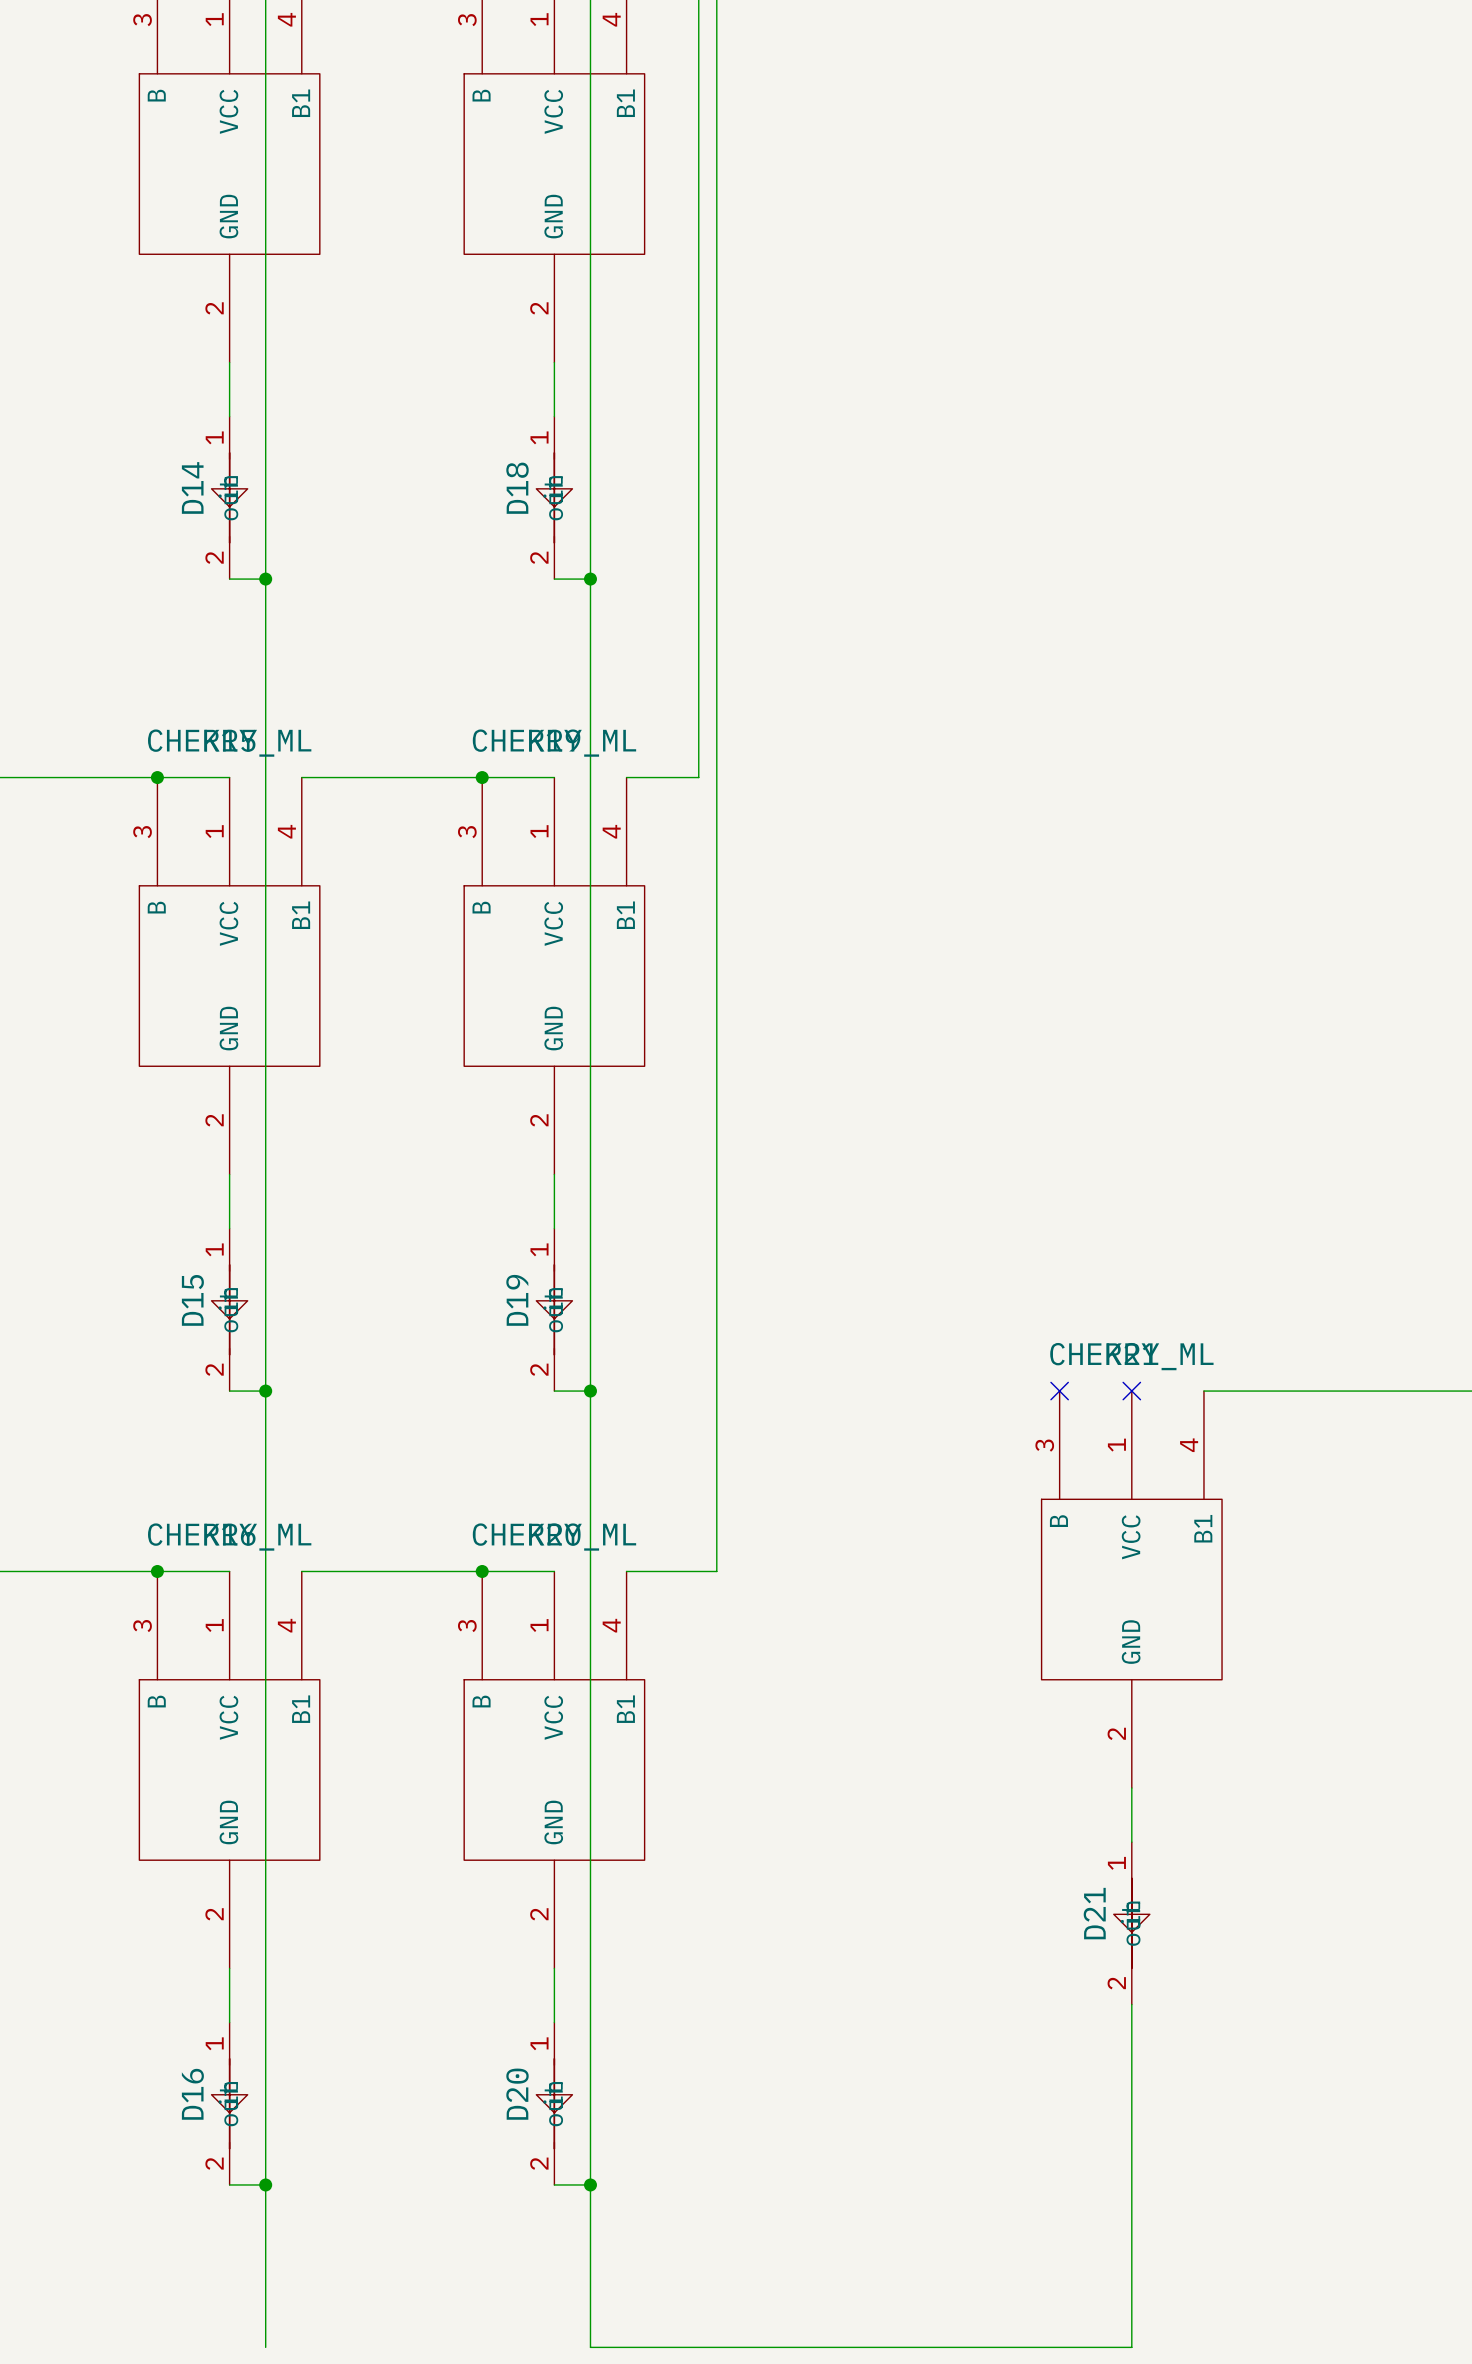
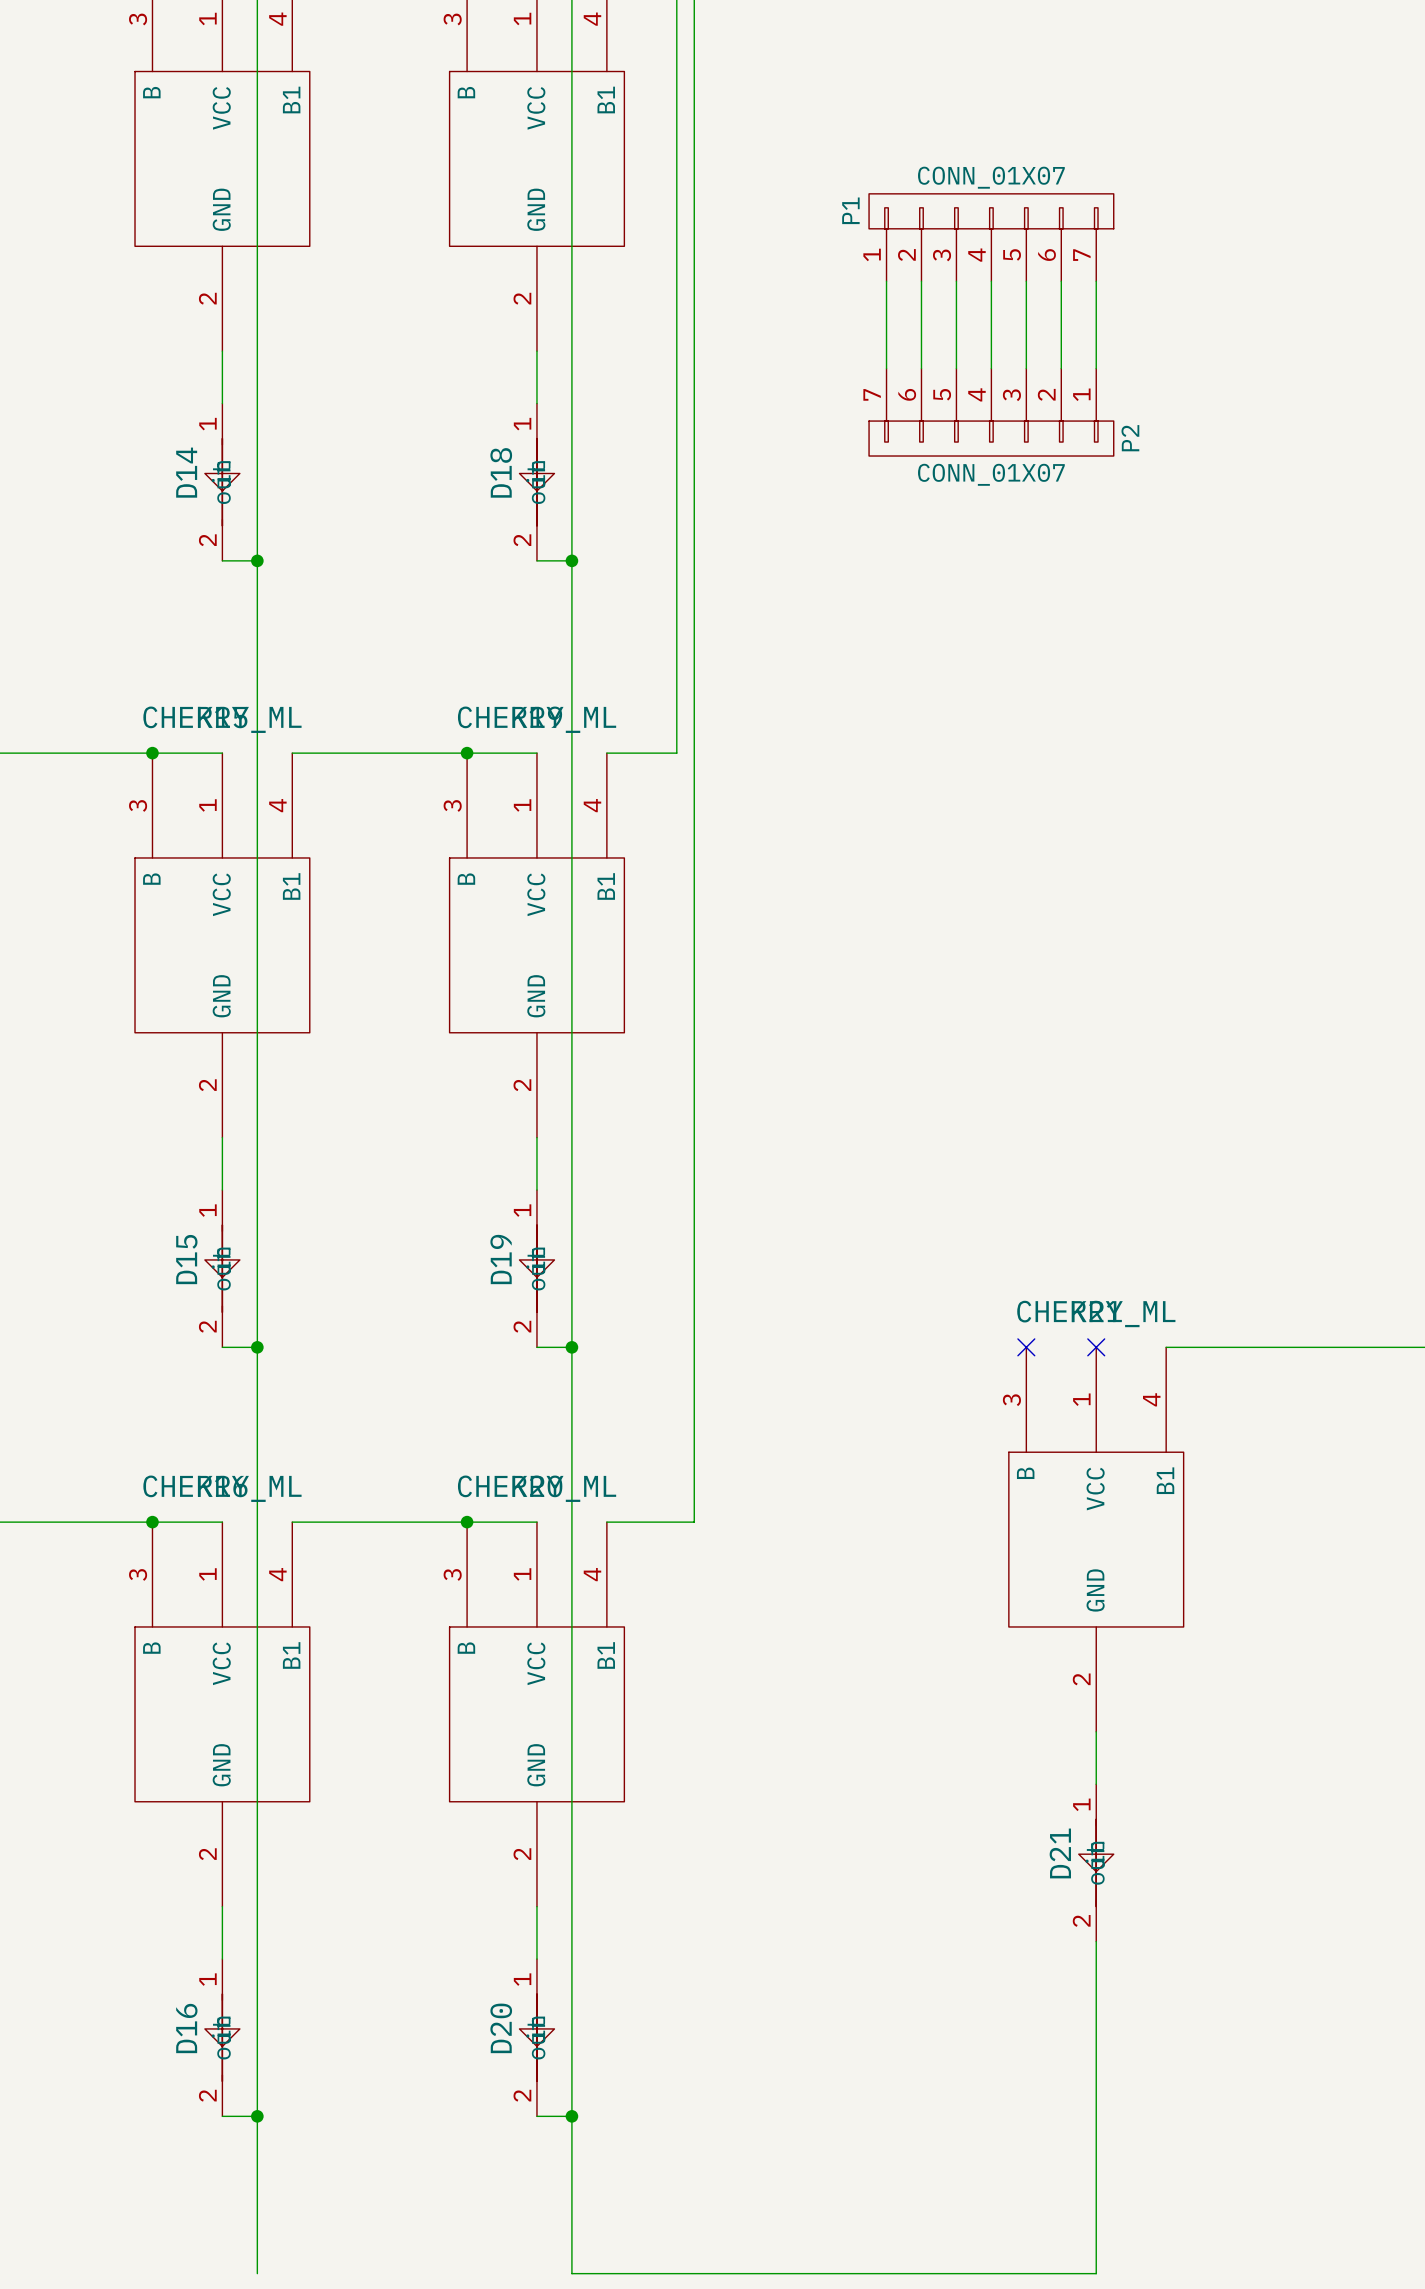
P1: none -> CONN_01X07 (991, 237)
wire: none -> (886, 281) (886, 368)
wire: none -> (921, 281) (921, 368)
wire: none -> (956, 281) (956, 368)
wire: none -> (991, 281) (991, 368)
wire: none -> (1026, 281) (1026, 368)
wire: none -> (1061, 281) (1061, 368)
wire: none -> (1096, 281) (1096, 368)
P2: none -> CONN_01X07 (991, 412)

